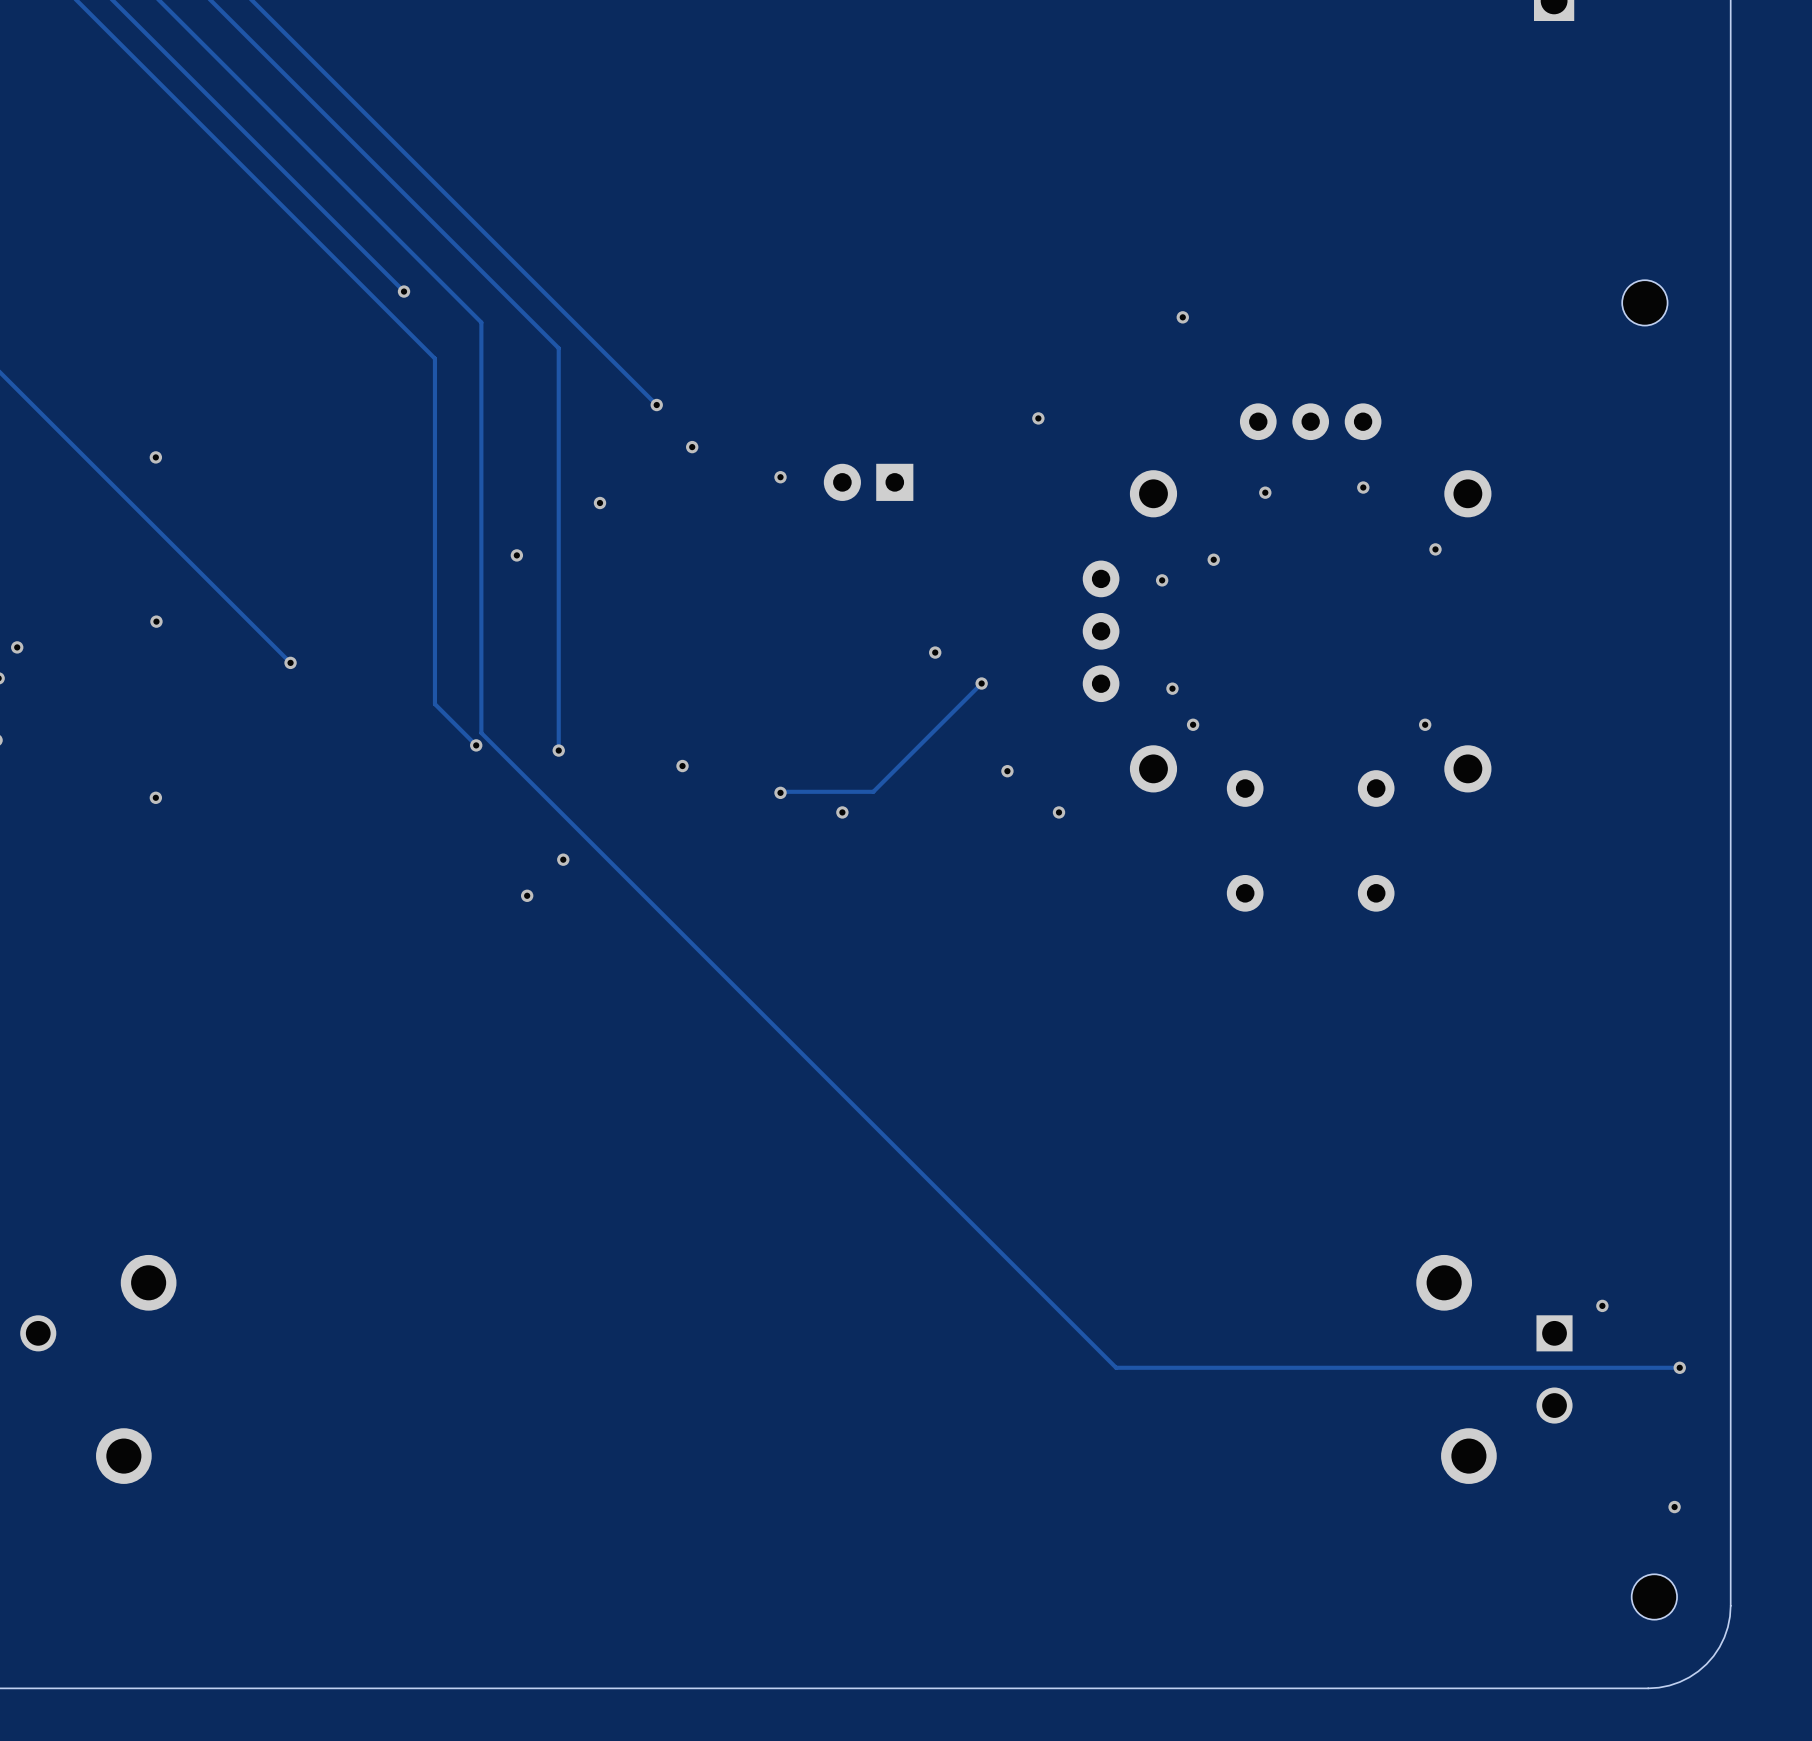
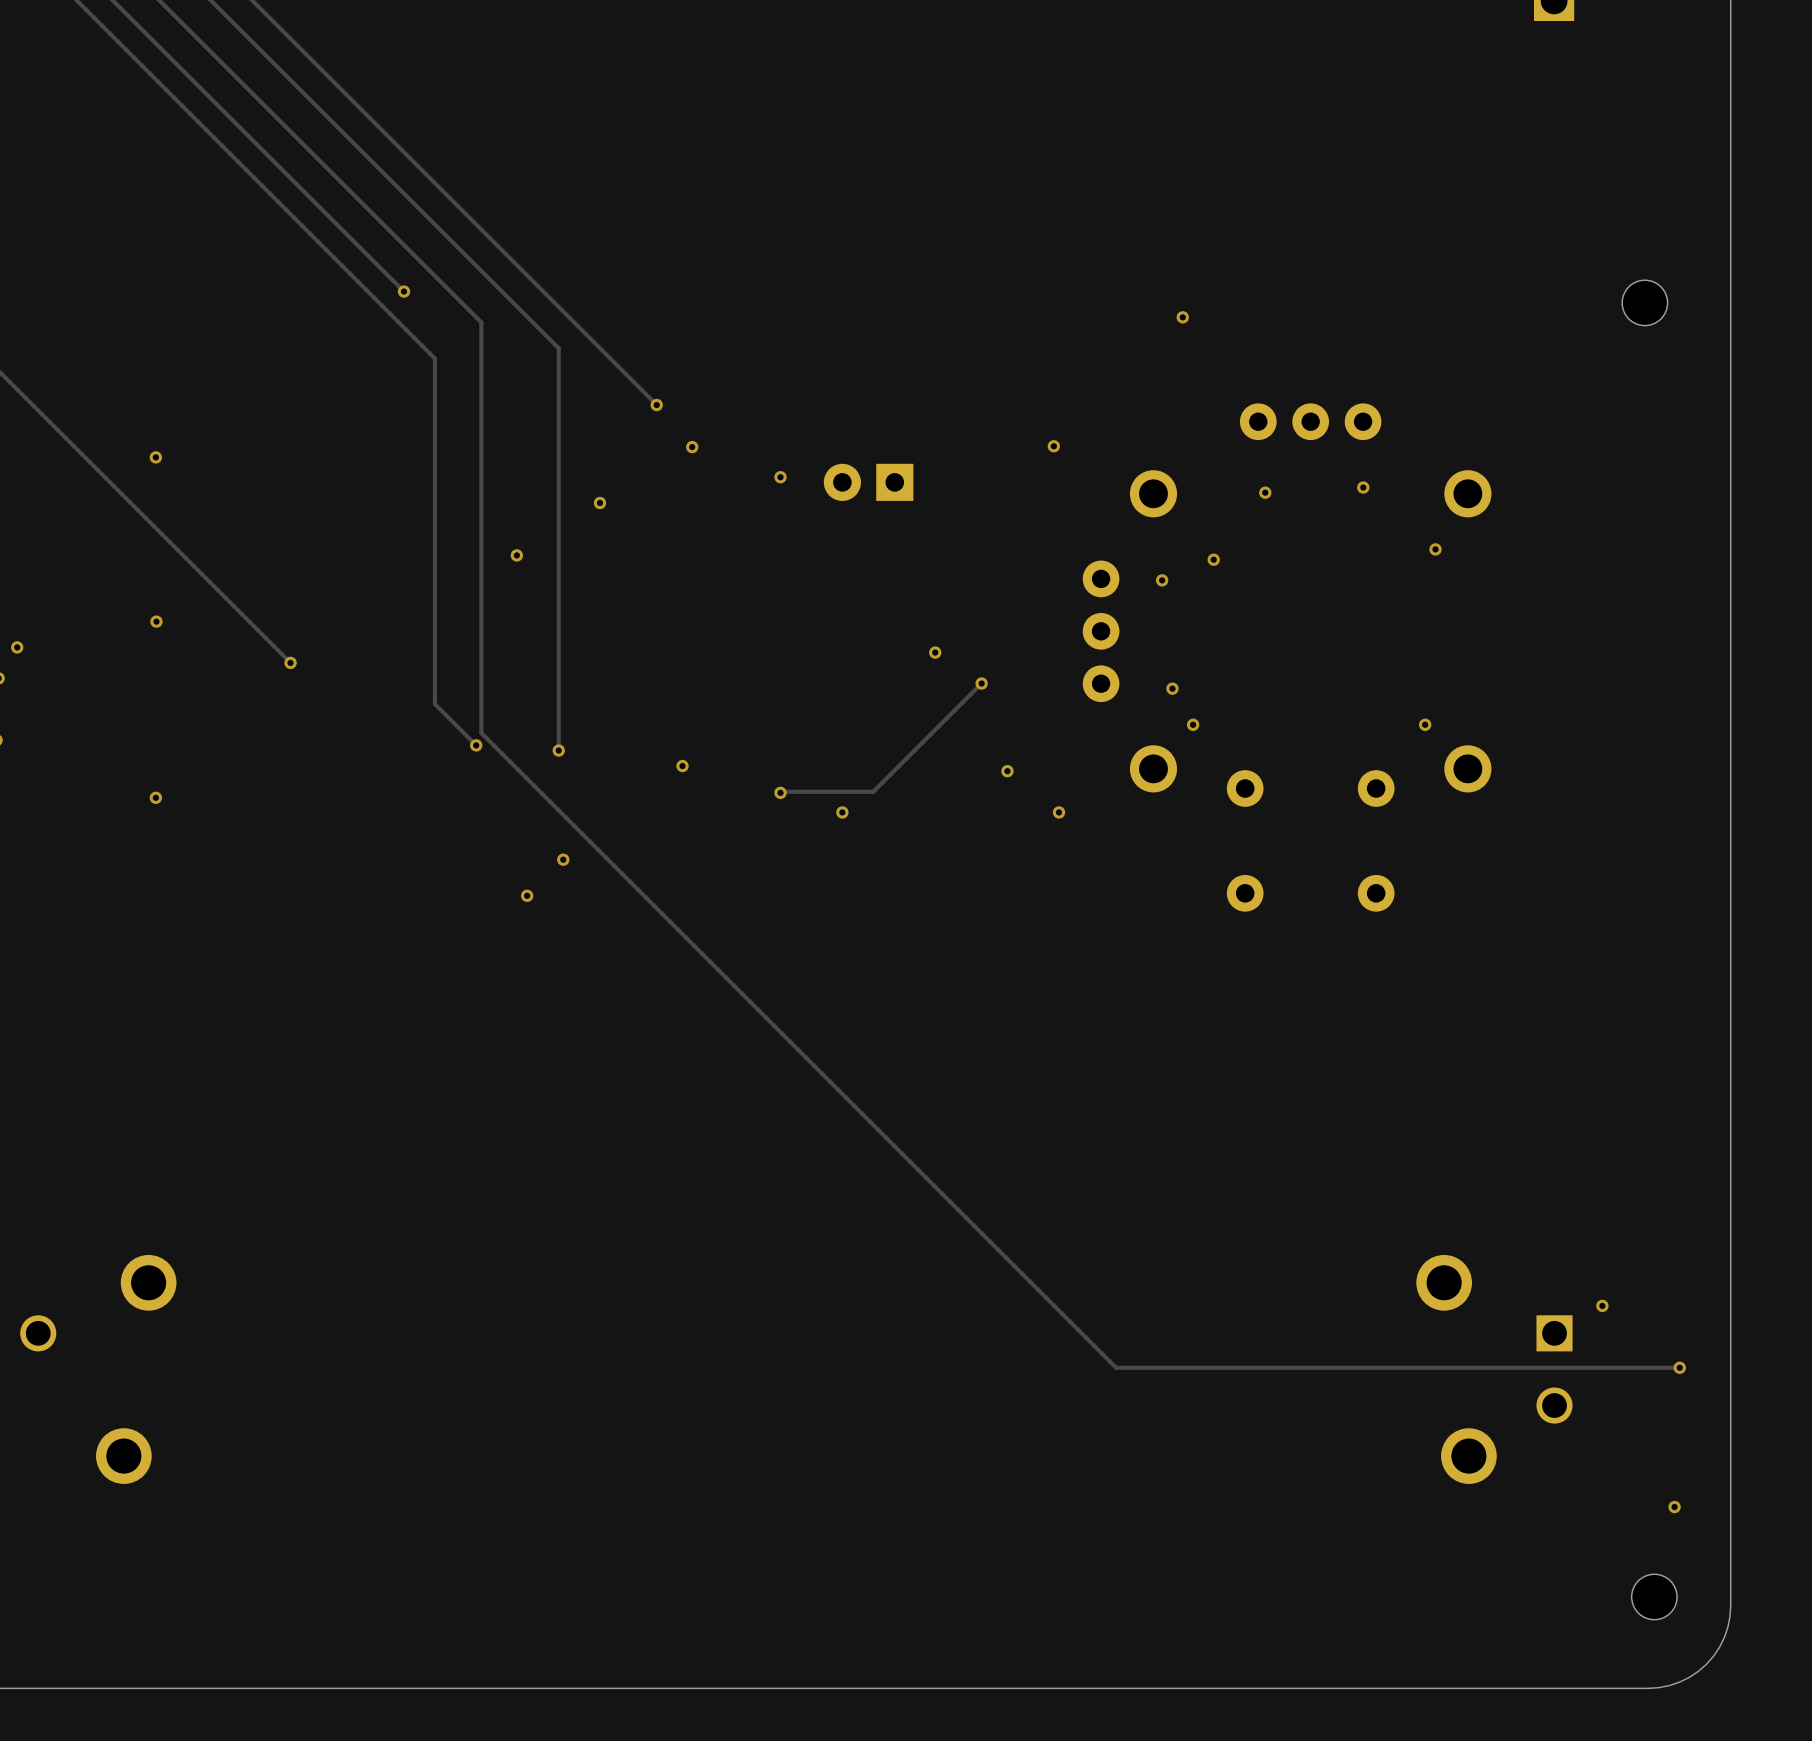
via position: (1038, 418) -> (1053, 446)

